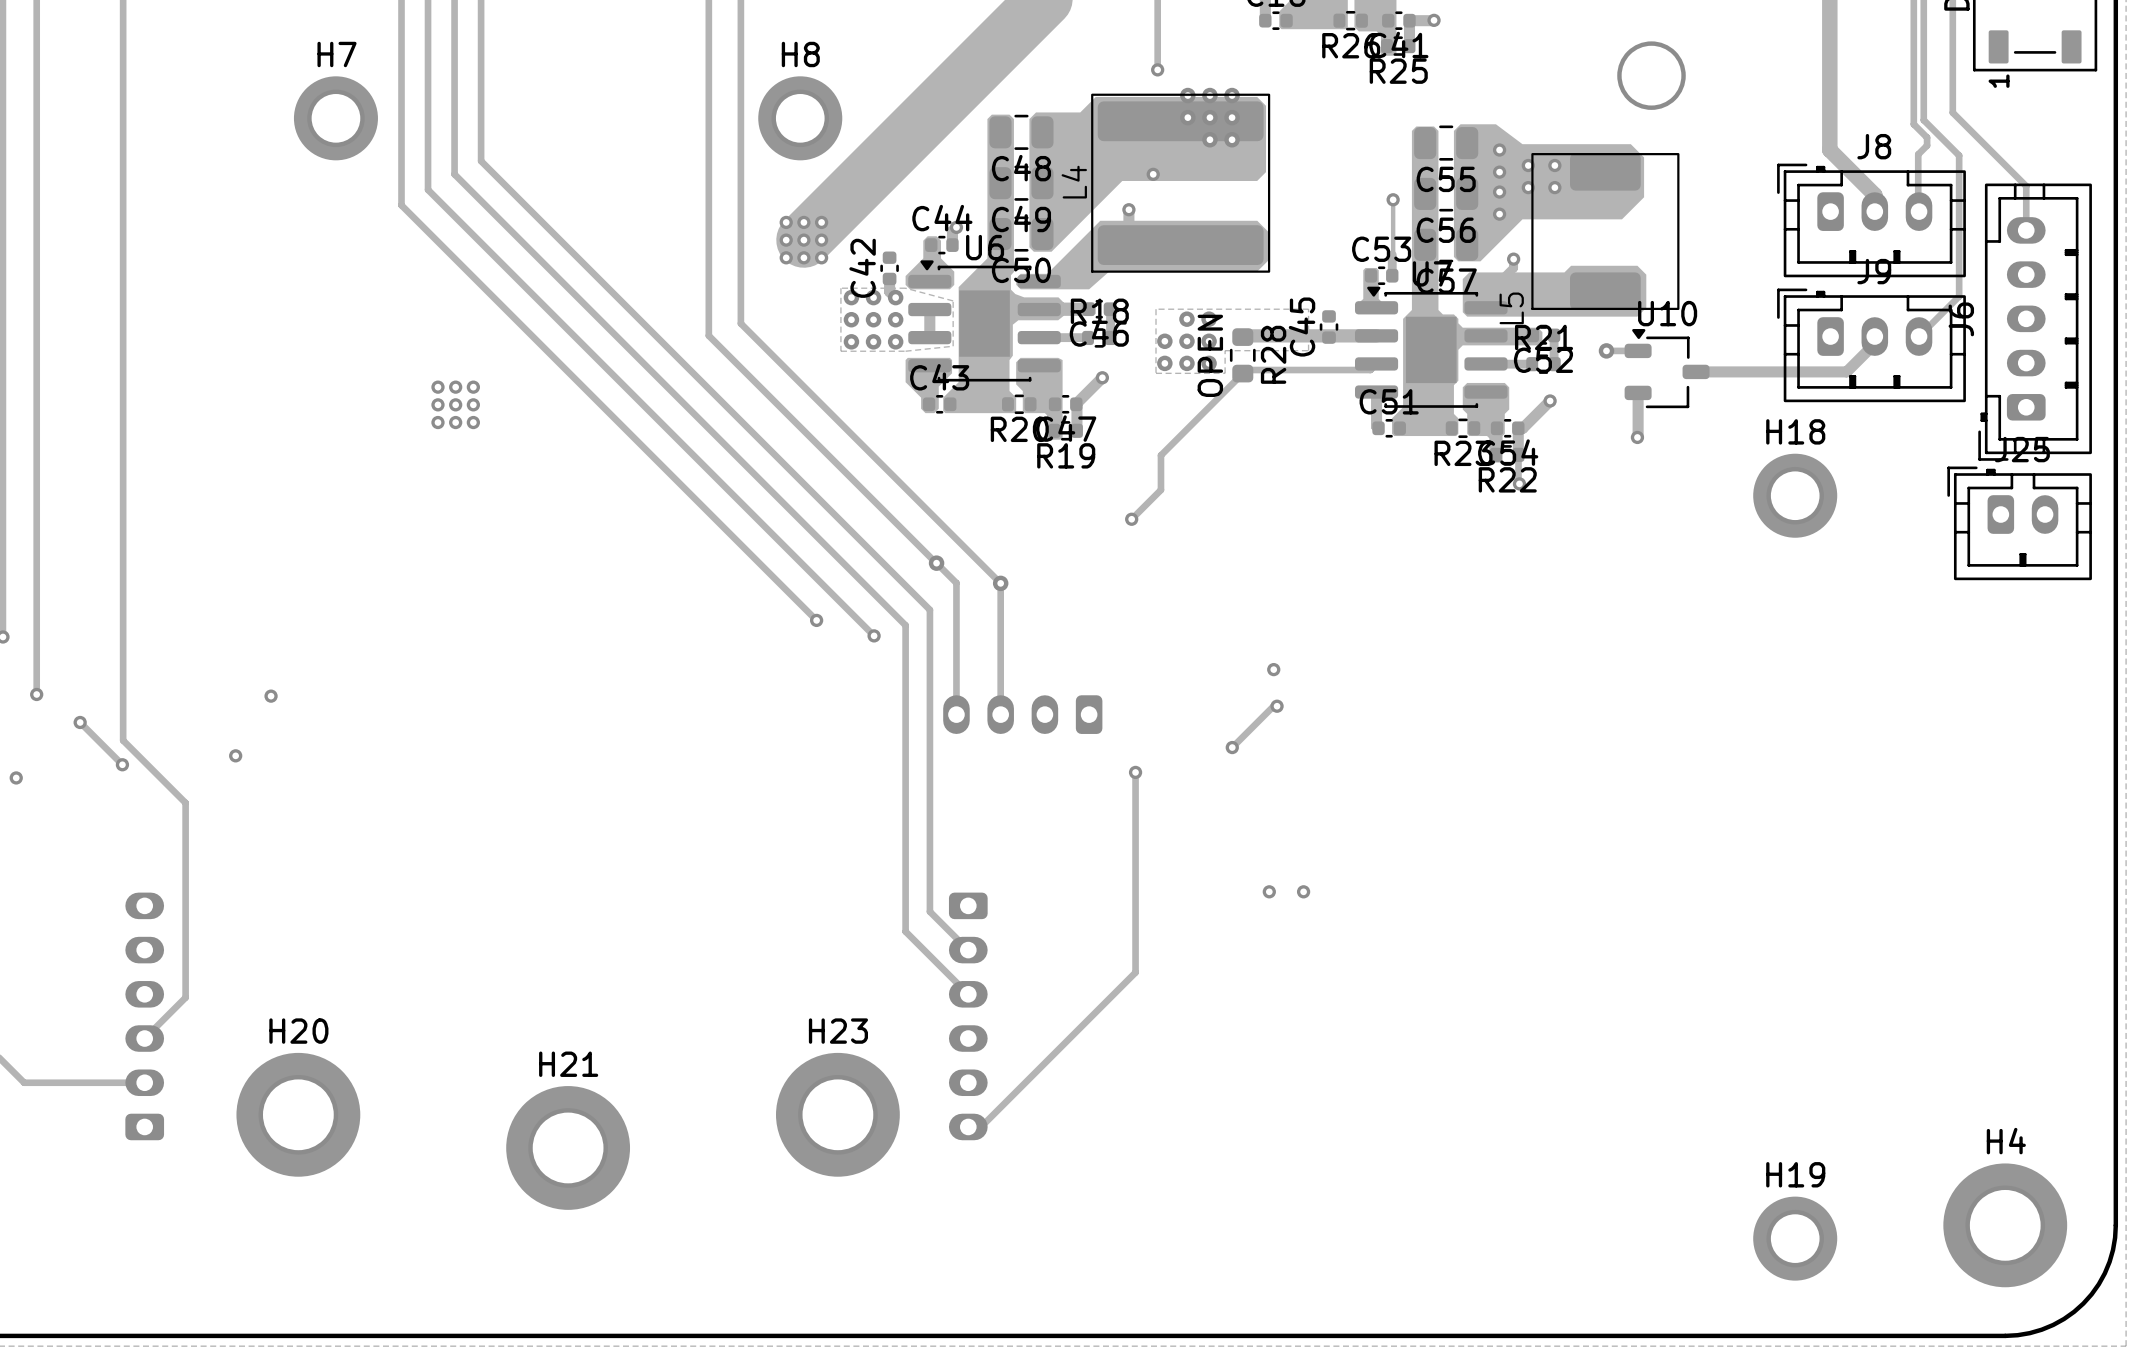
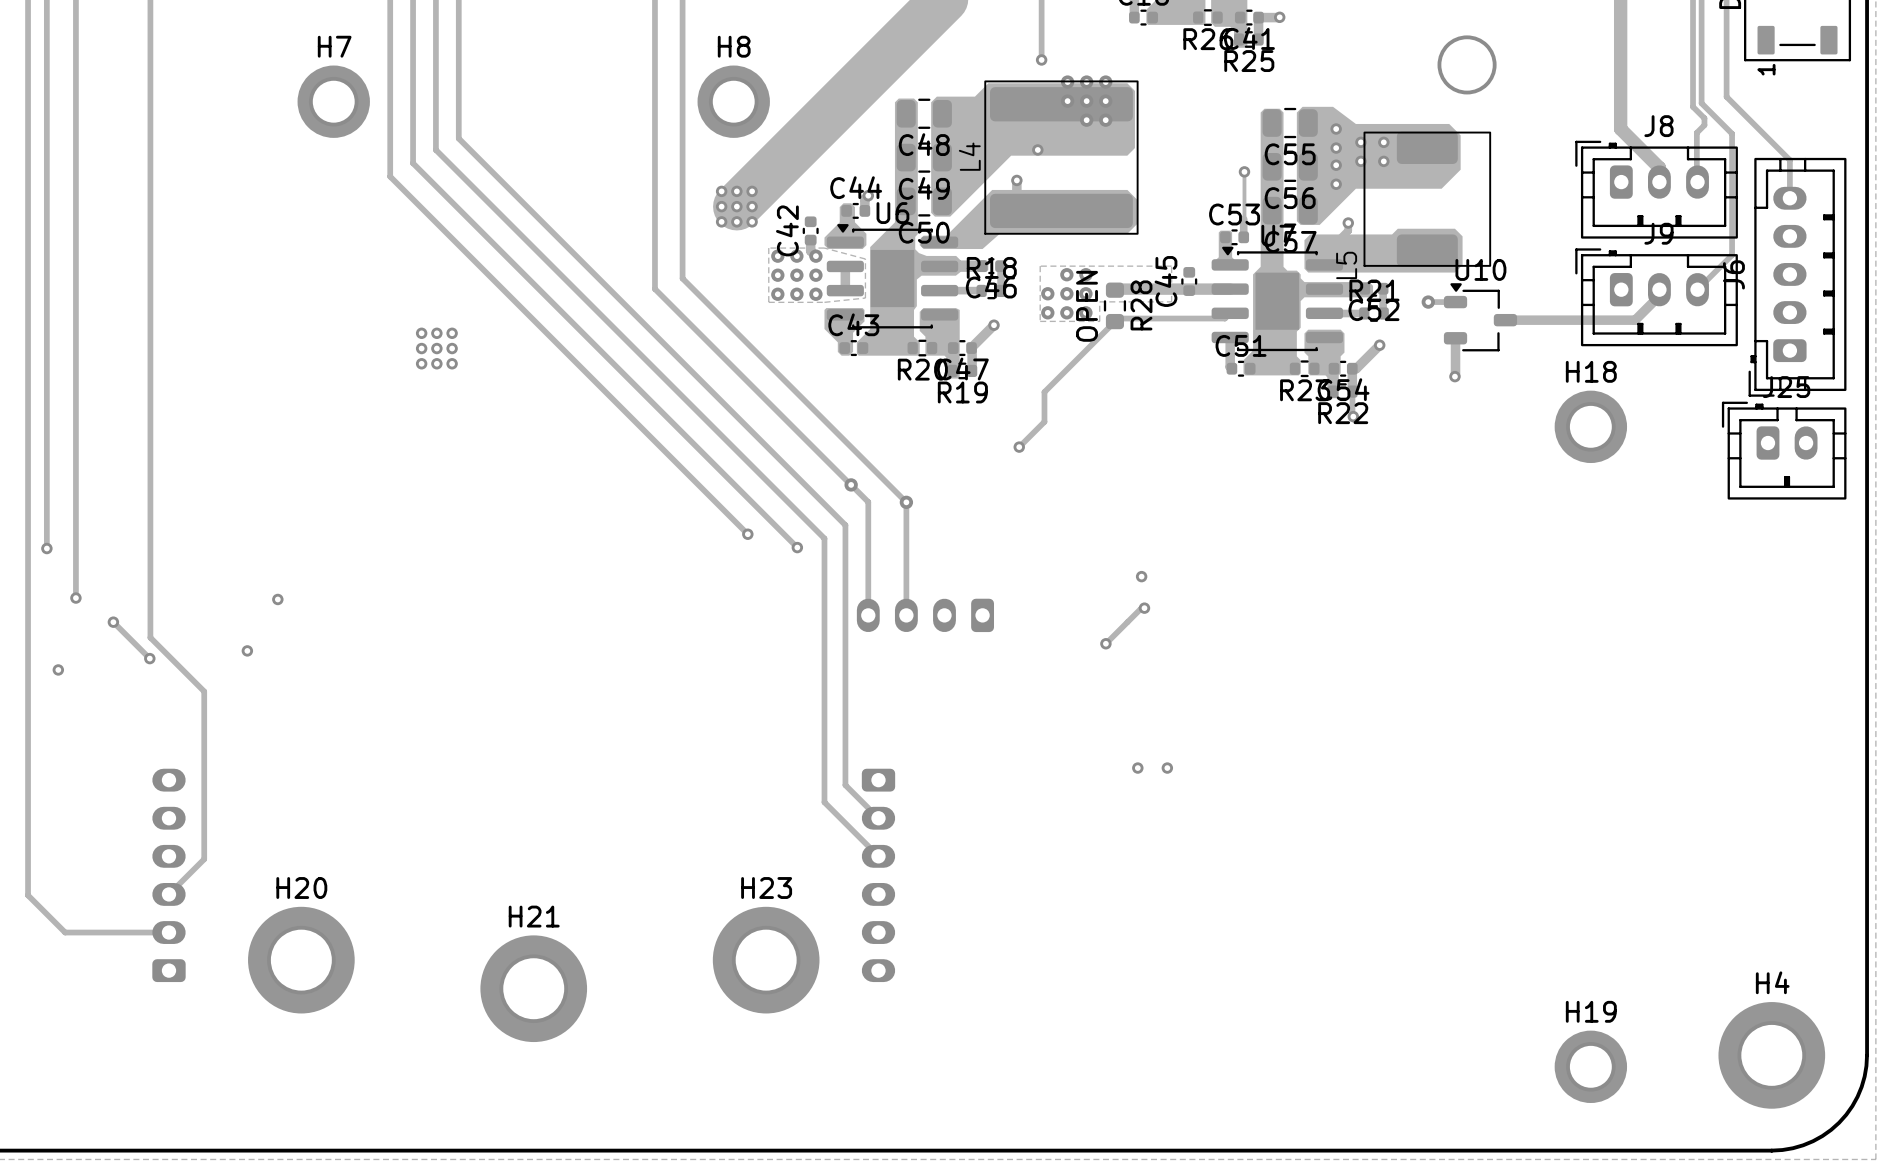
track: (1135, 772) (1135, 972) (981, 1126) (968, 1126) -> none
via: (1135, 772) -> none

